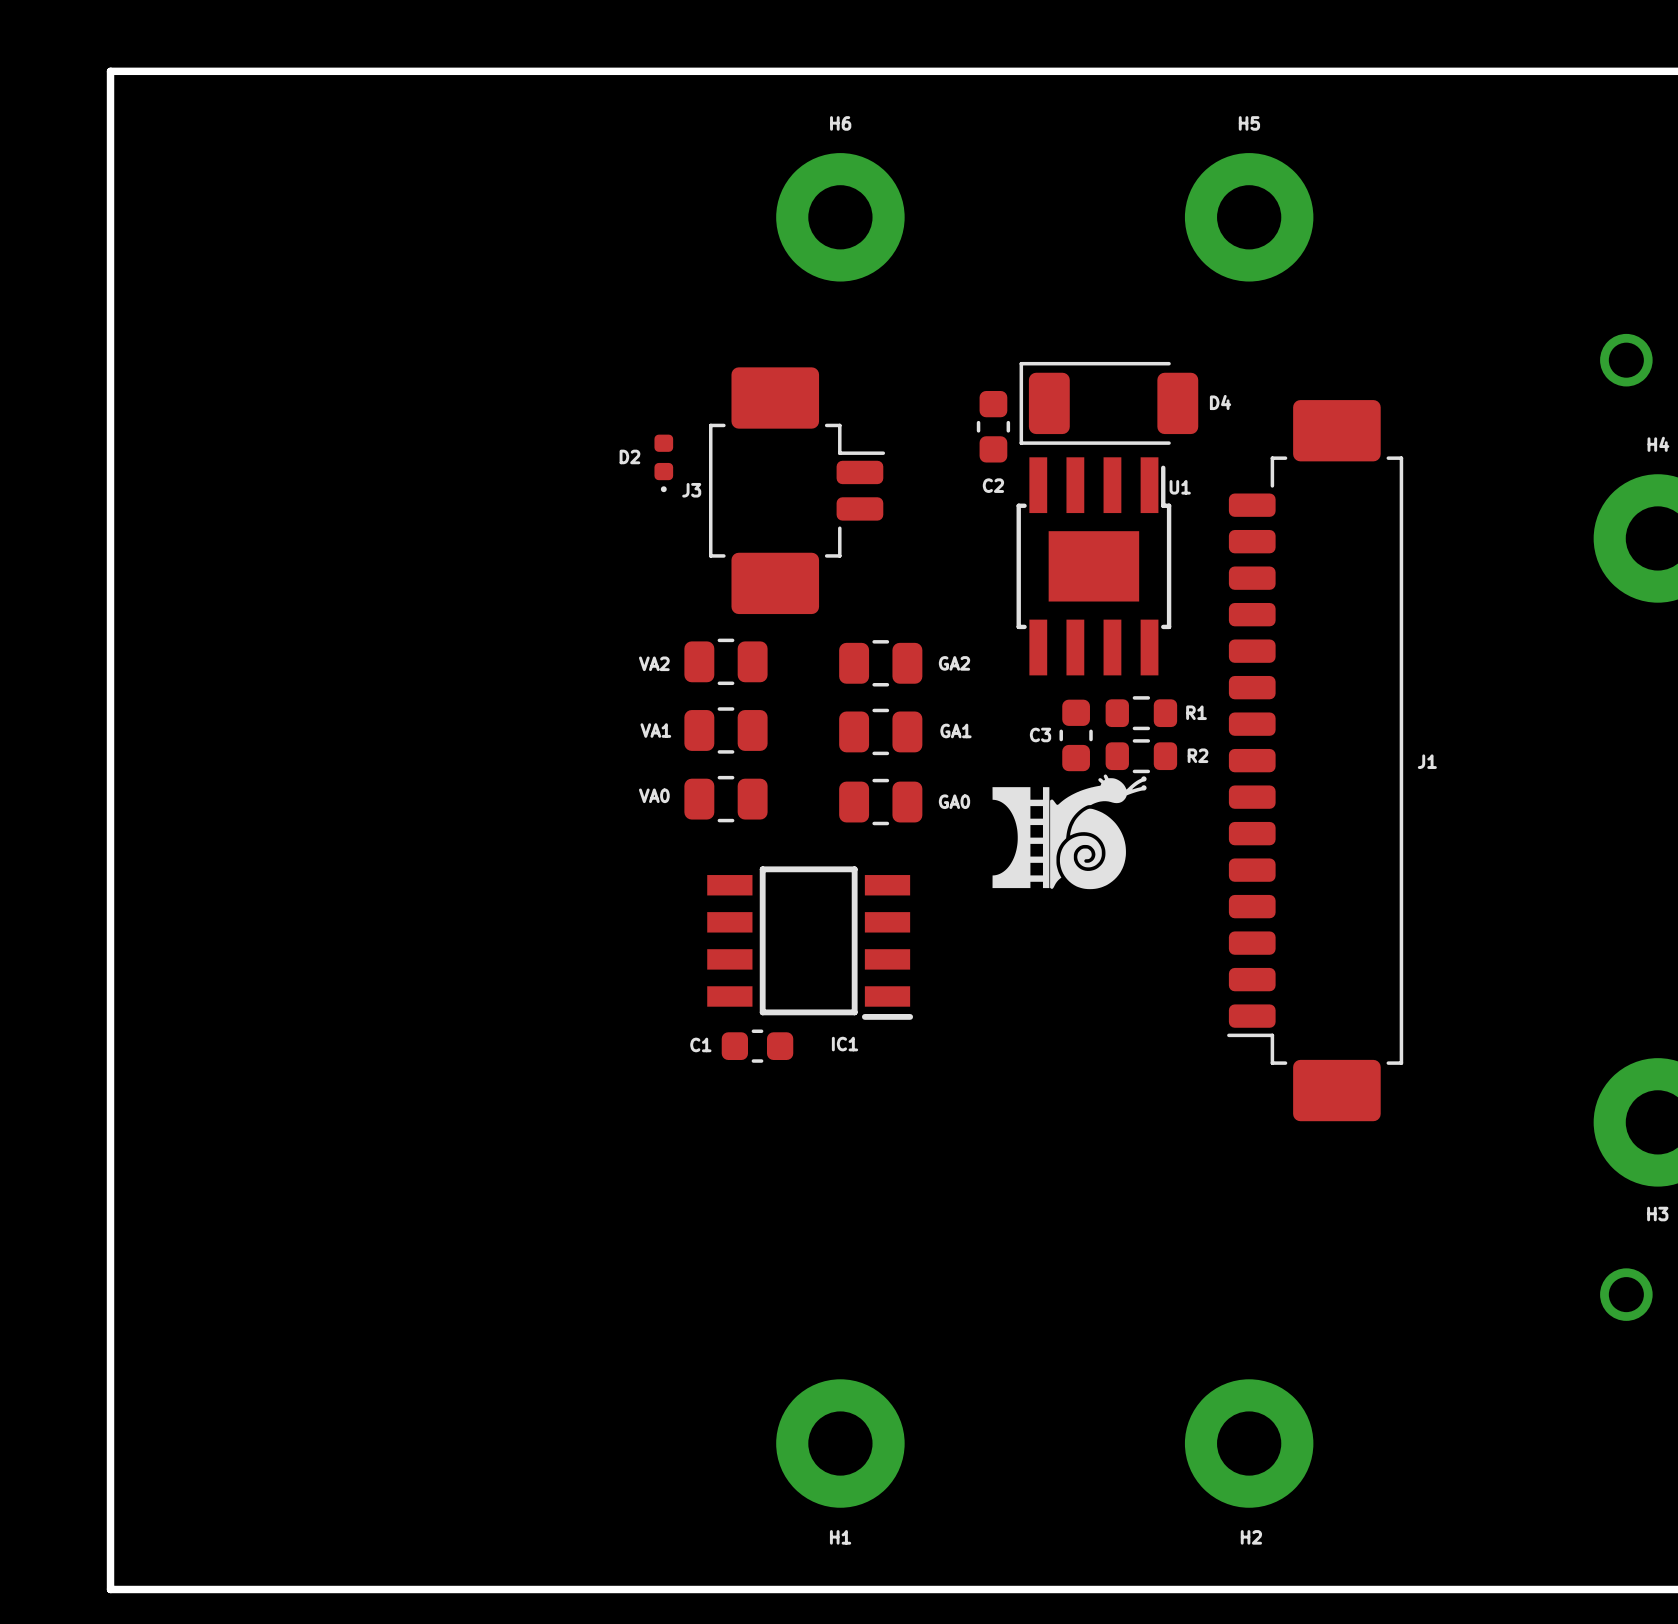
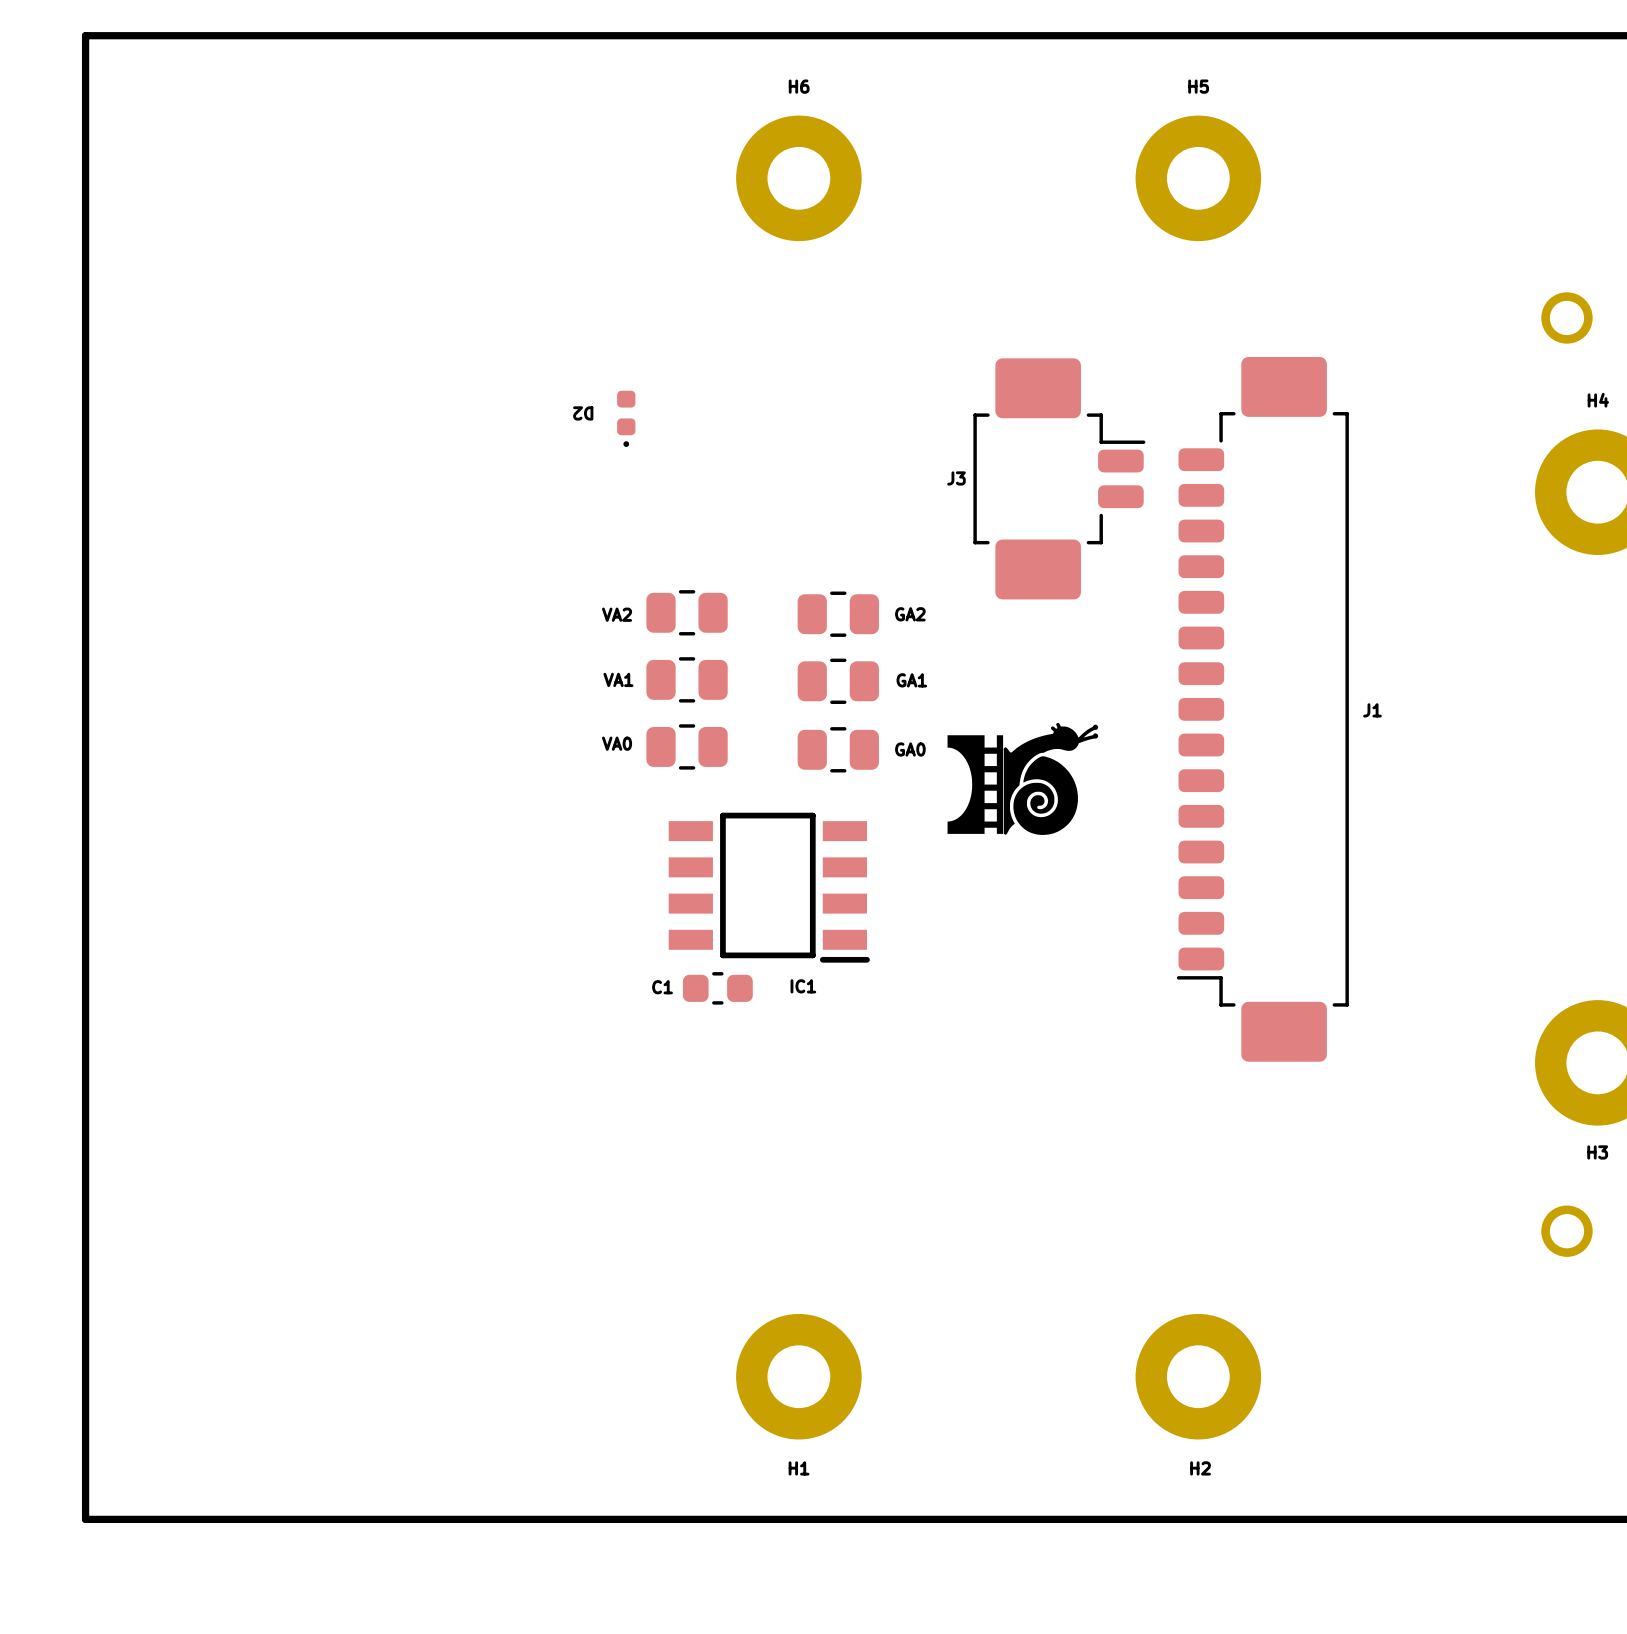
D4: (1108, 403) -> none
C2: (993, 426) -> none
D2 name rotation: 0° (629, 456) -> 180° (583, 413)
J3 position: (797, 490) -> (1059, 478)
U1: (1093, 566) -> none
R1: (1141, 713) -> none
C3: (1076, 735) -> none
R2: (1141, 756) -> none

